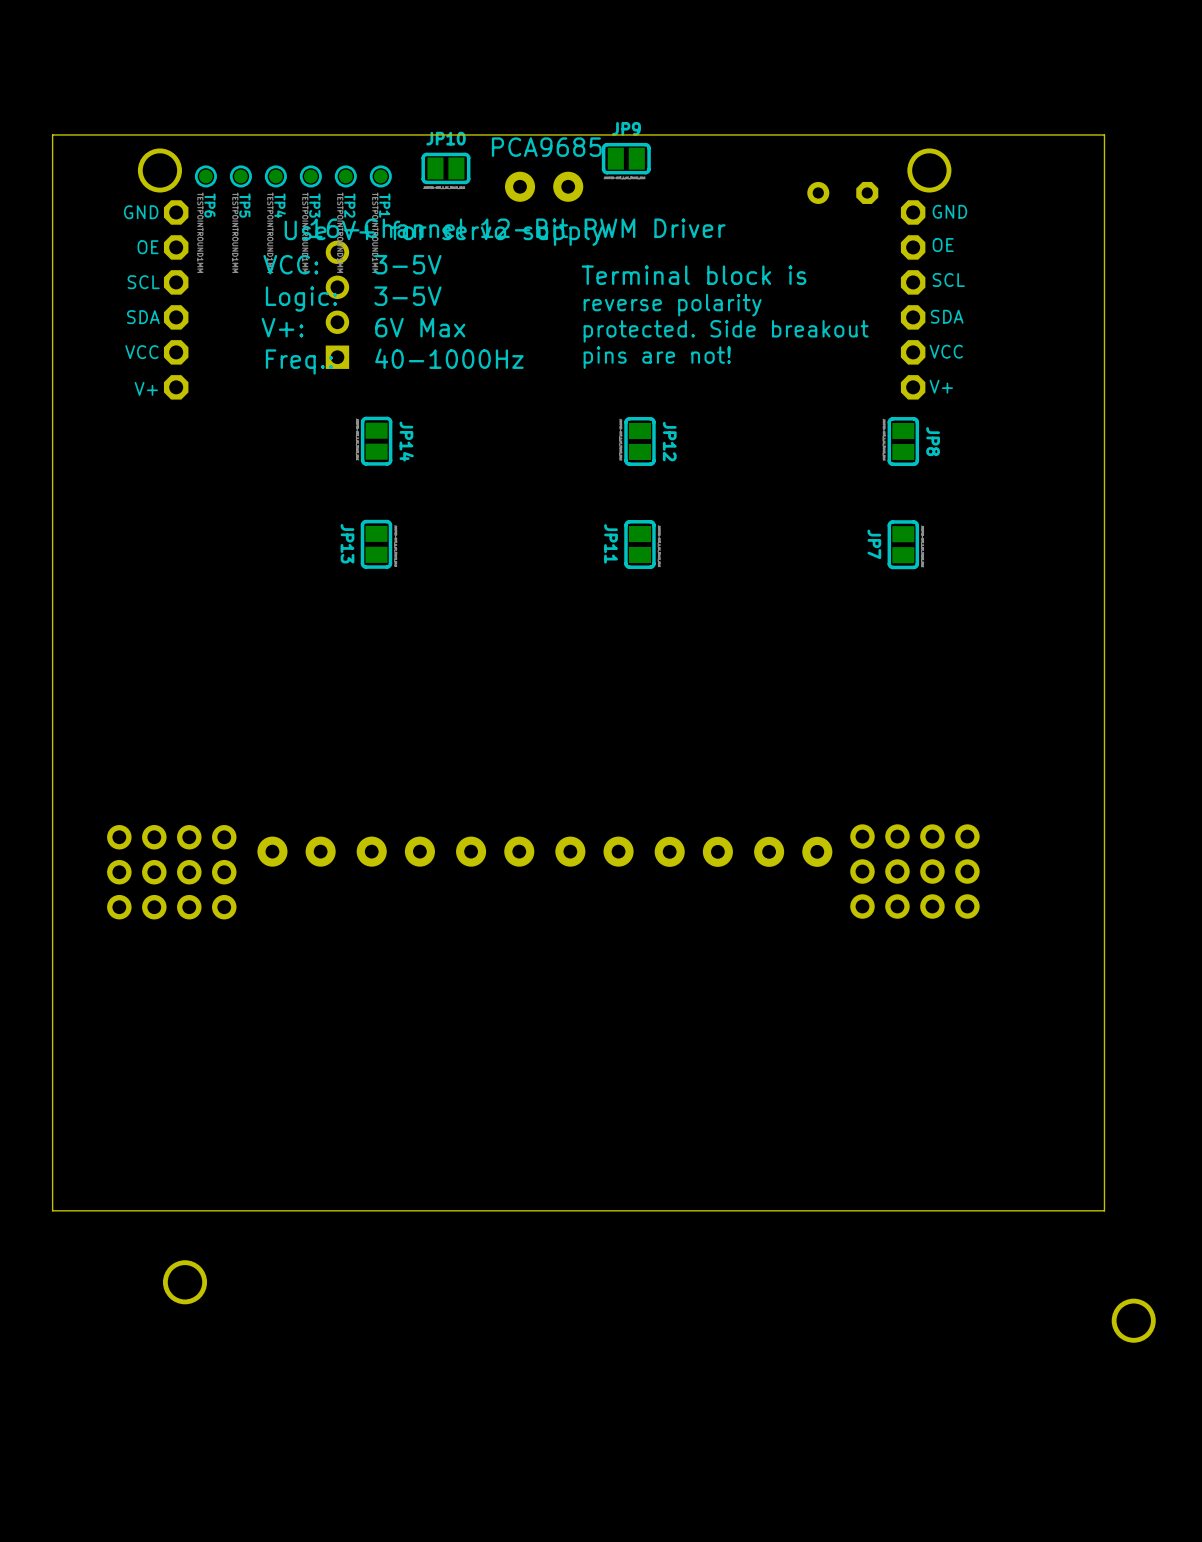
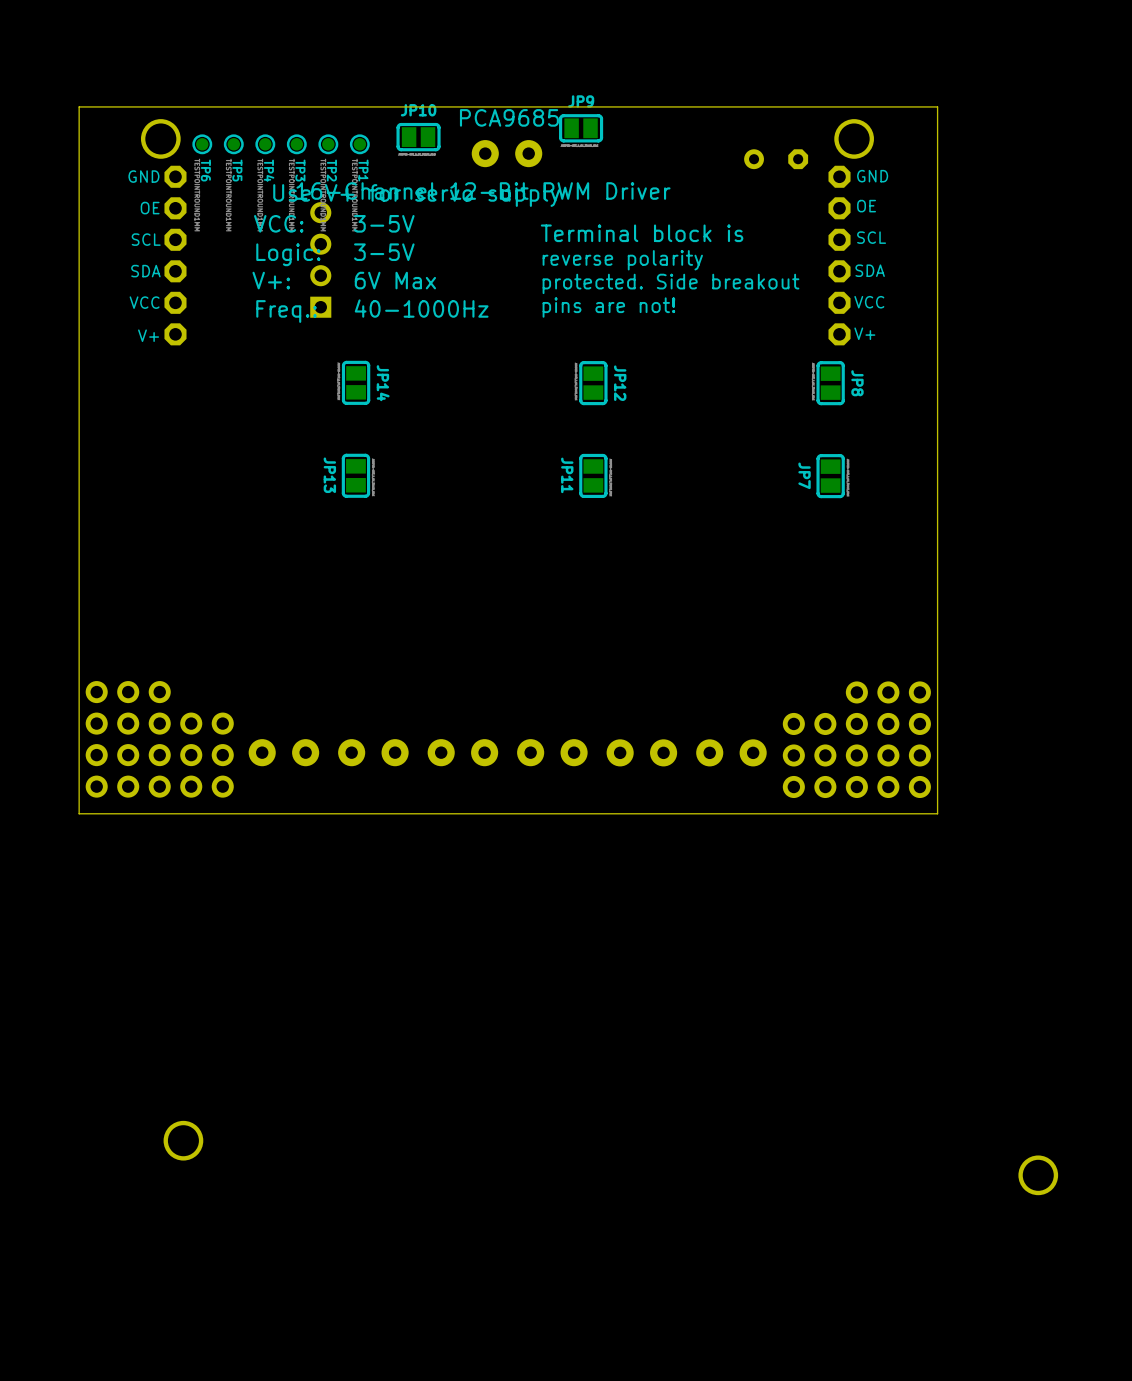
board edge: (1022, 134) (1104, 134) (1104, 1210) (52, 1210) (52, 134) (69, 134) -> (937, 106) (937, 813) (79, 813) (79, 106)
part: none -> (207, 755)
part: none -> (809, 755)
part rotation: 0° (914, 871) -> 90° clockwise (888, 739)
part rotation: 0° (171, 872) -> 90° clockwise (128, 739)

